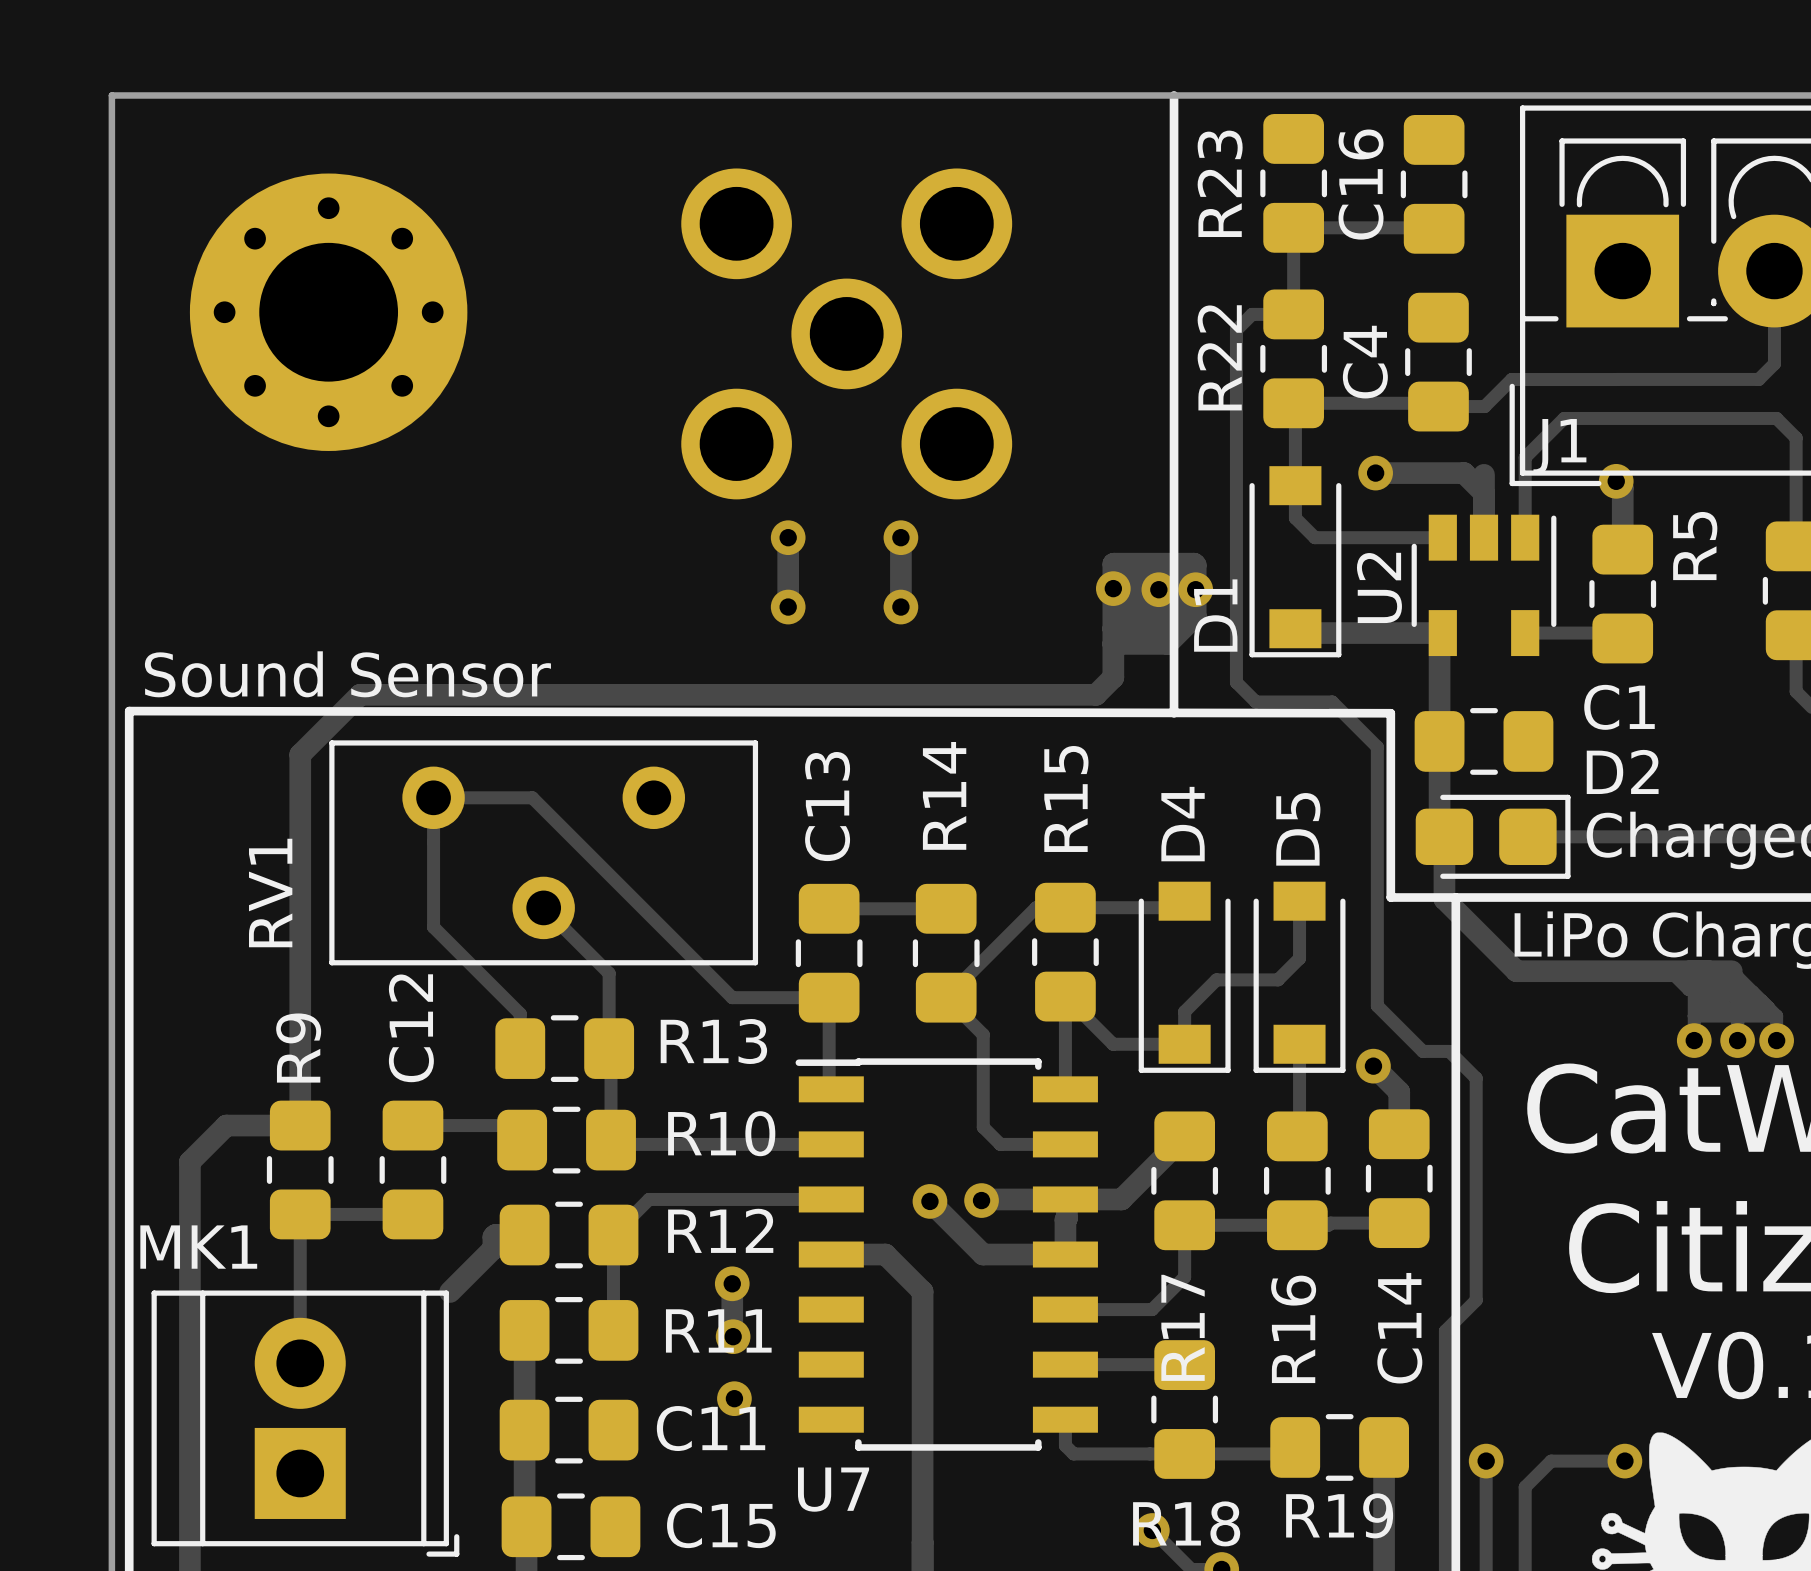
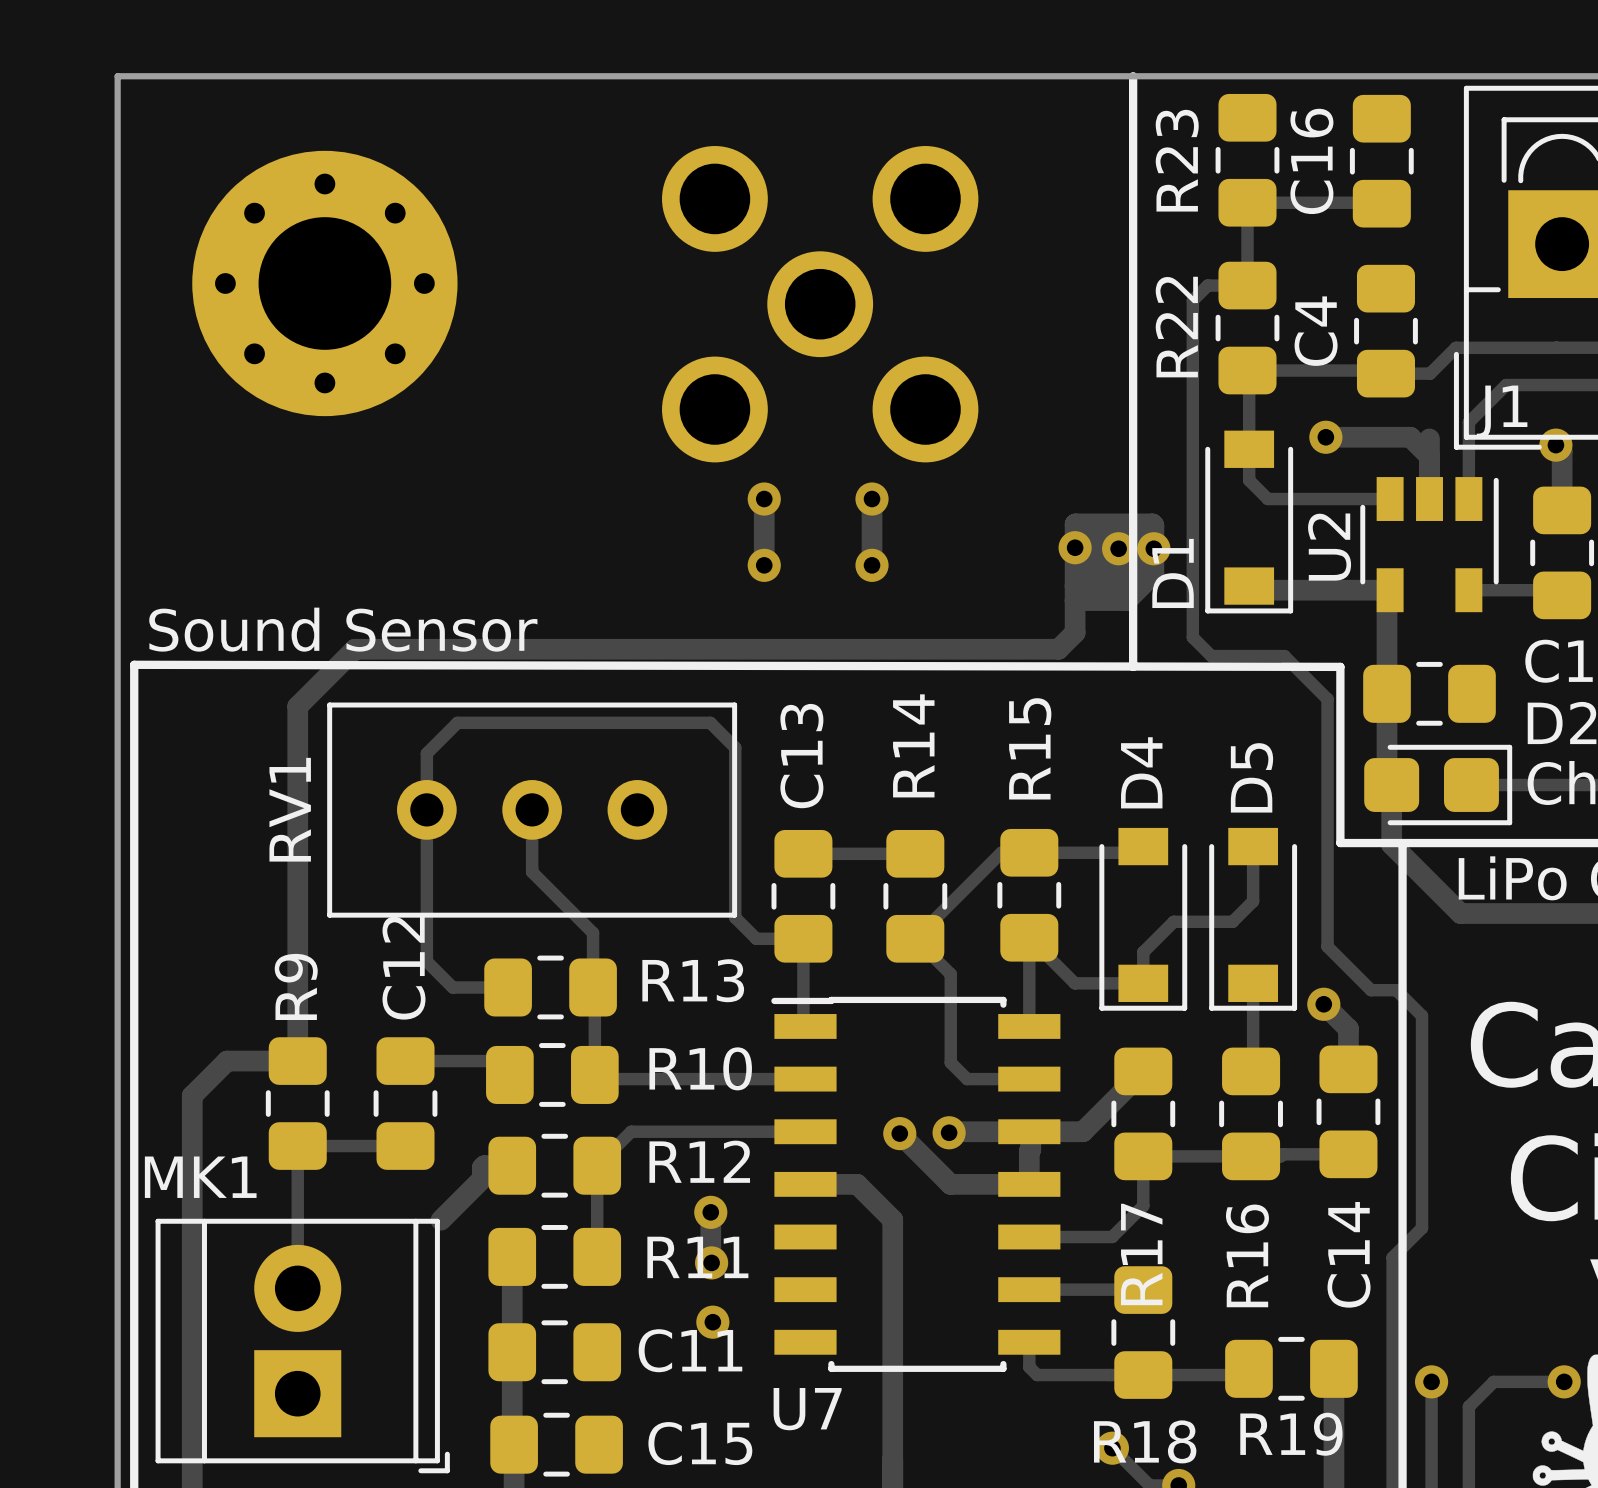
RV1 footprint: [329, 740, 759, 966] -> [327, 702, 738, 918]
track: (543, 907) (609, 973) (609, 991) -> (532, 809) (532, 872) (593, 932)
track: (779, 997) (732, 997) (532, 797) (433, 797) (433, 927) (520, 1013) (520, 1048) -> (756, 938) (735, 917) (735, 747) (710, 722) (457, 722) (426, 753) (426, 961) (452, 987) (508, 987)

